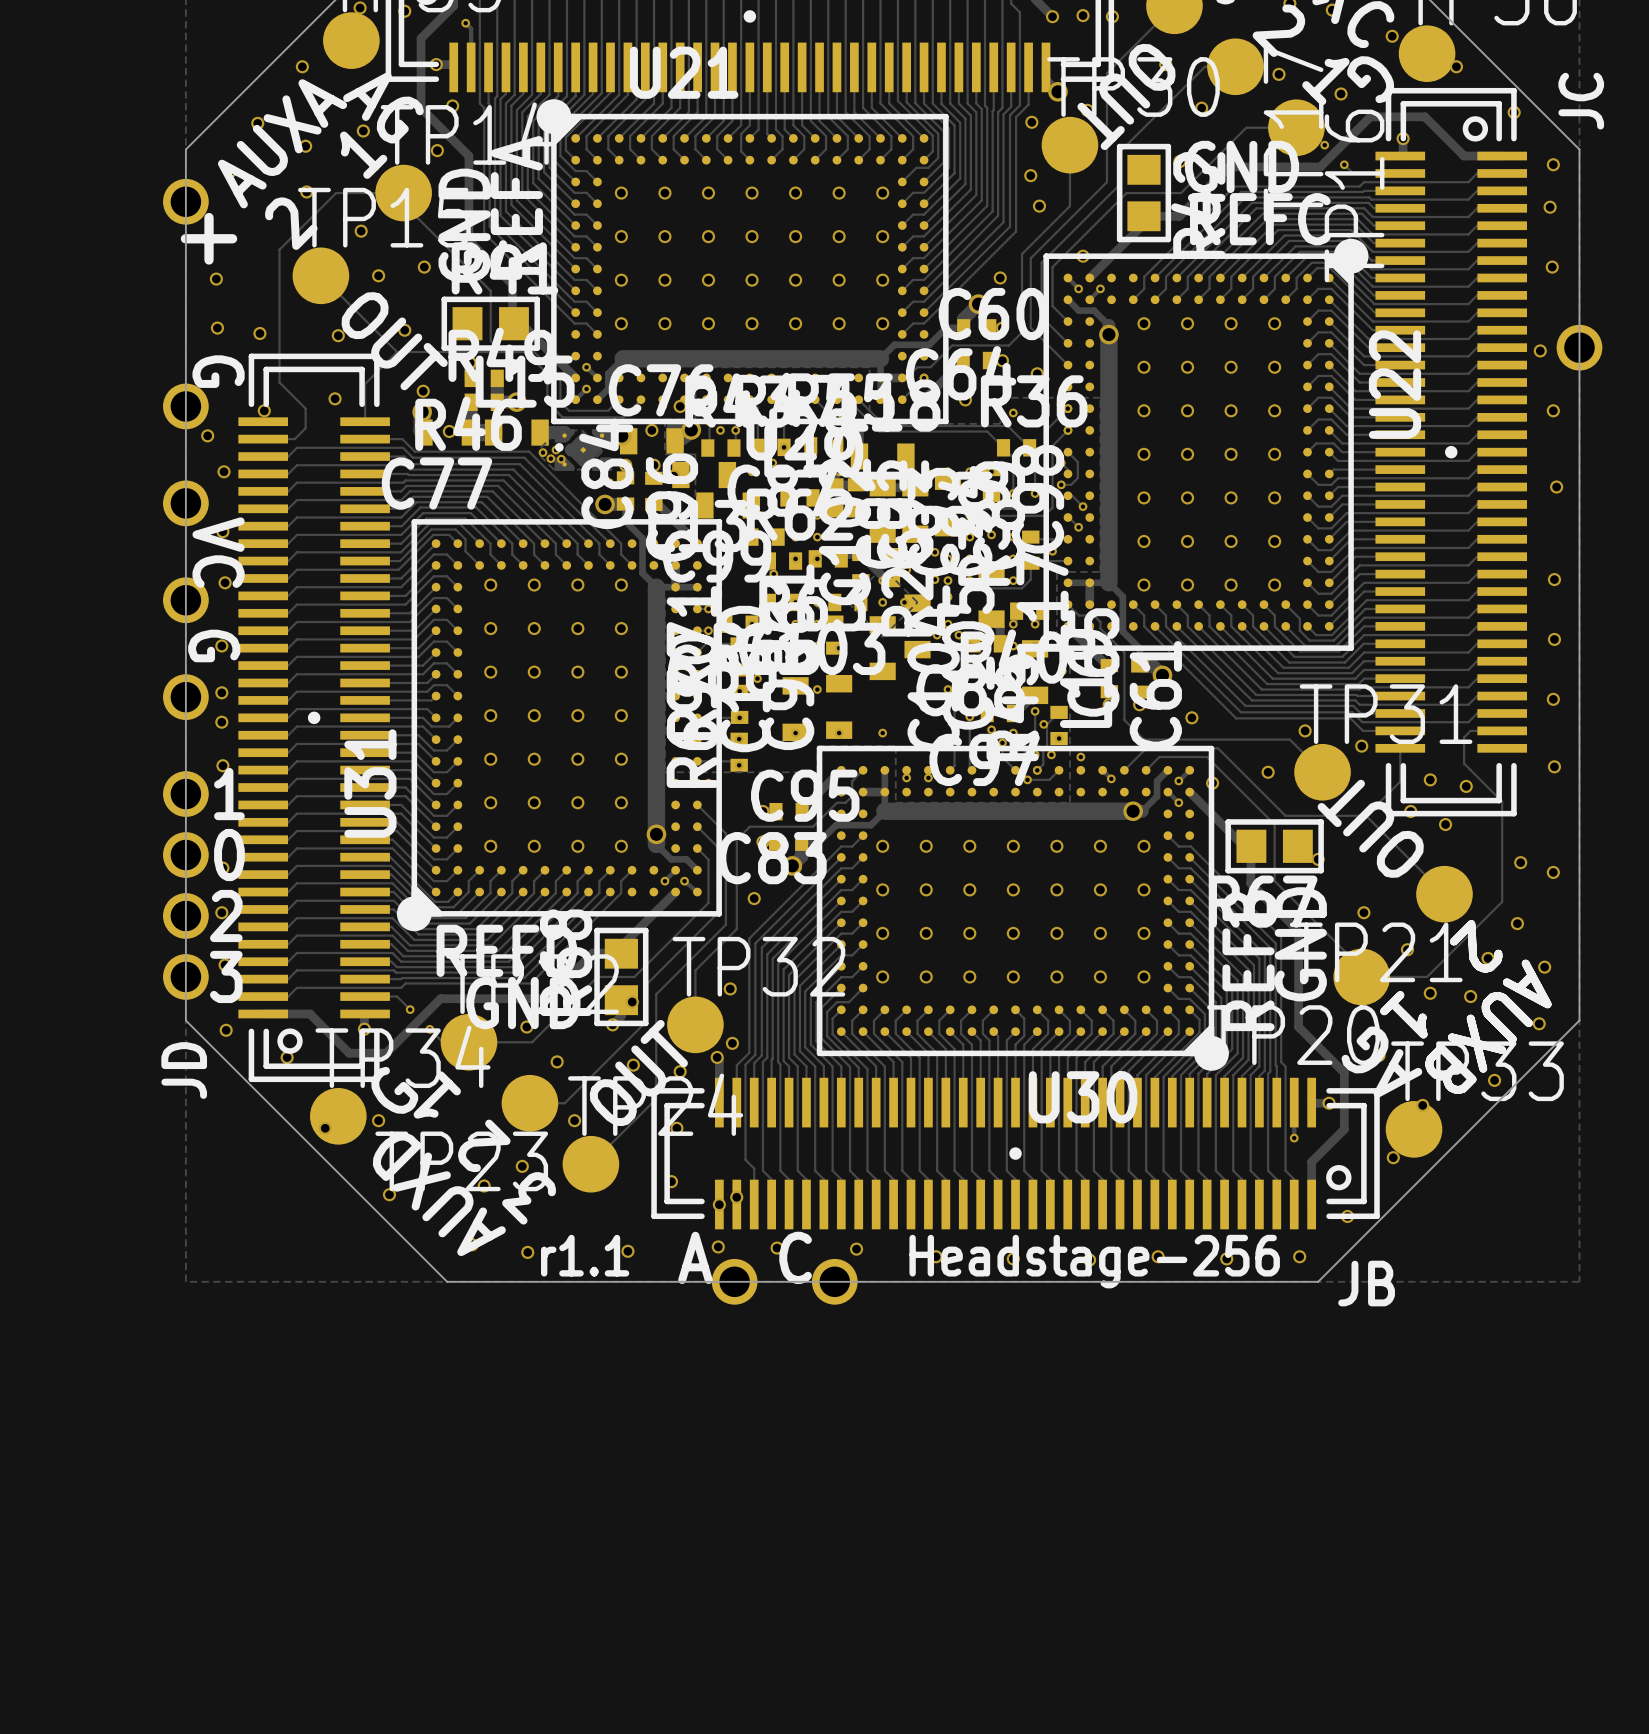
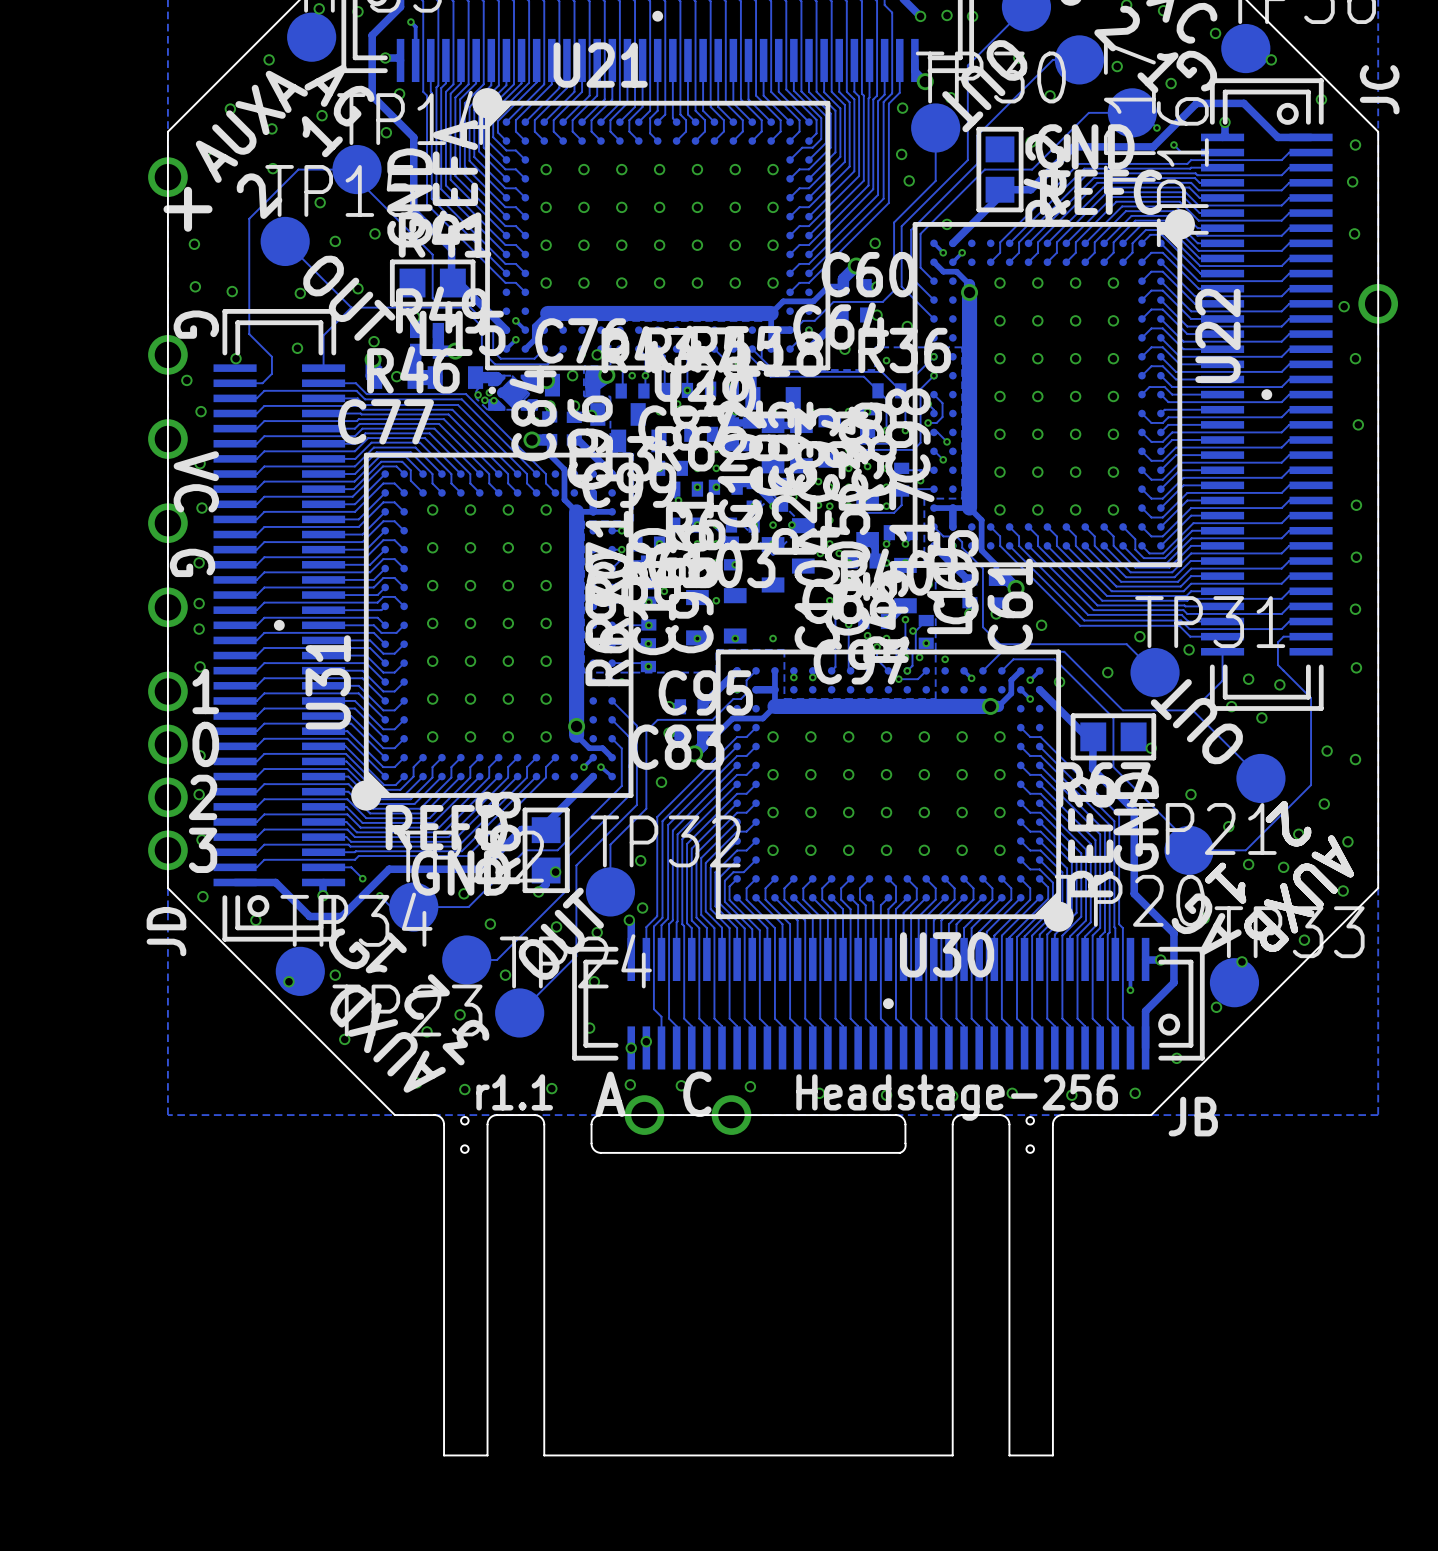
board edge: (564, 1281) (492, 1281) -> (496, 1115) (490, 1117) (487, 1124) (487, 1455) (444, 1455) (444, 1124) (441, 1117) (434, 1115)
board edge: (684, 1281) (608, 1281) -> (600, 1115) (594, 1117) (591, 1124) (591, 1145) (594, 1150) (599, 1152) (899, 1152) (905, 1146) (905, 1123) (902, 1117) (895, 1115)
board edge: (1100, 1281) (1024, 1281) -> (962, 1115) (955, 1117) (952, 1124) (952, 1455) (544, 1455) (544, 1124) (541, 1117) (534, 1115)
board edge: (1215, 1281) (1143, 1281) -> (1062, 1115) (1055, 1117) (1052, 1124) (1052, 1455) (1009, 1455) (1009, 1124) (1006, 1117) (999, 1115)
hole: none -> (464, 1120)
hole: none -> (1030, 1120)
hole: none -> (464, 1149)
hole: none -> (1030, 1149)

